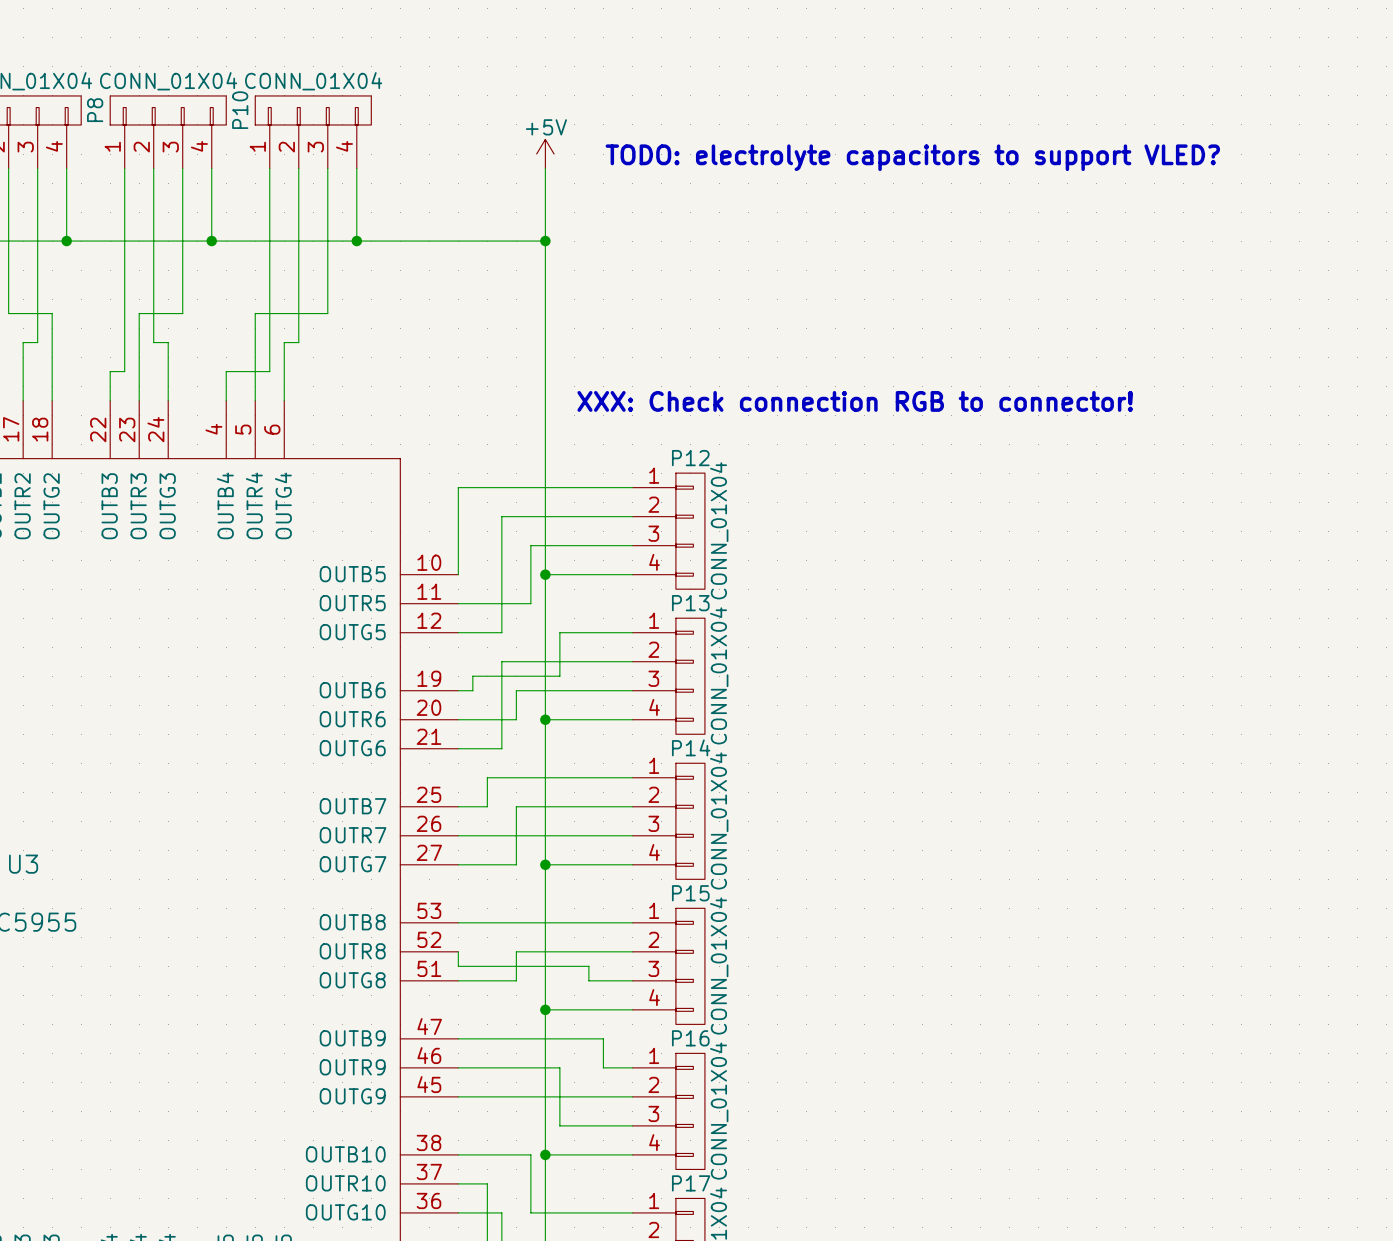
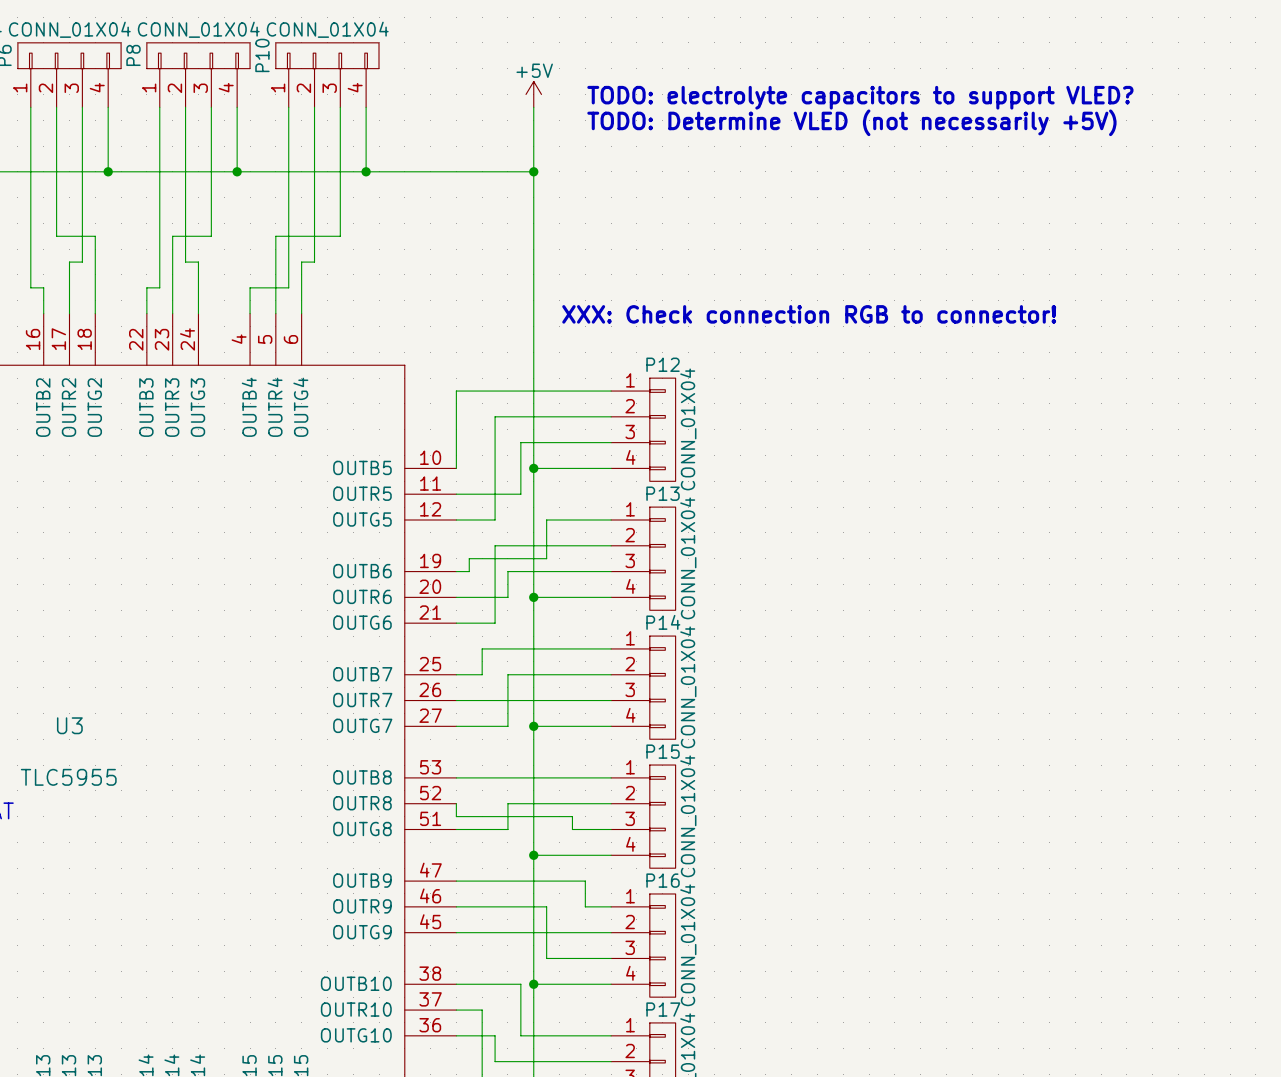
text: none -> TODO: Determine VLED (not necessarily +5V) (851, 122)

